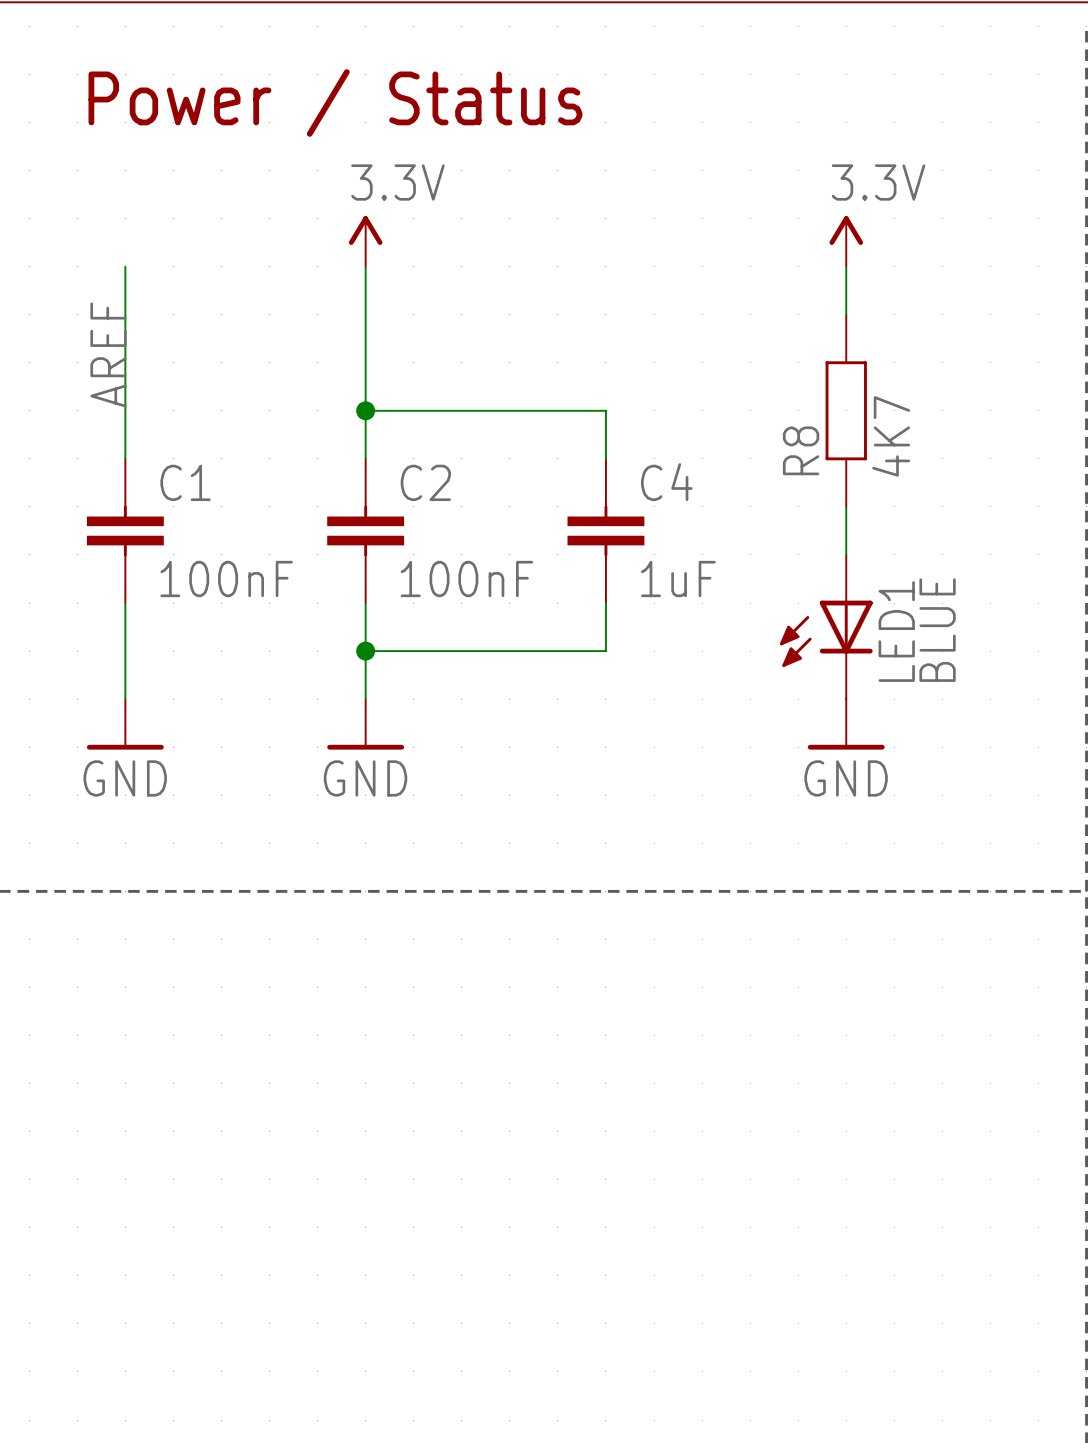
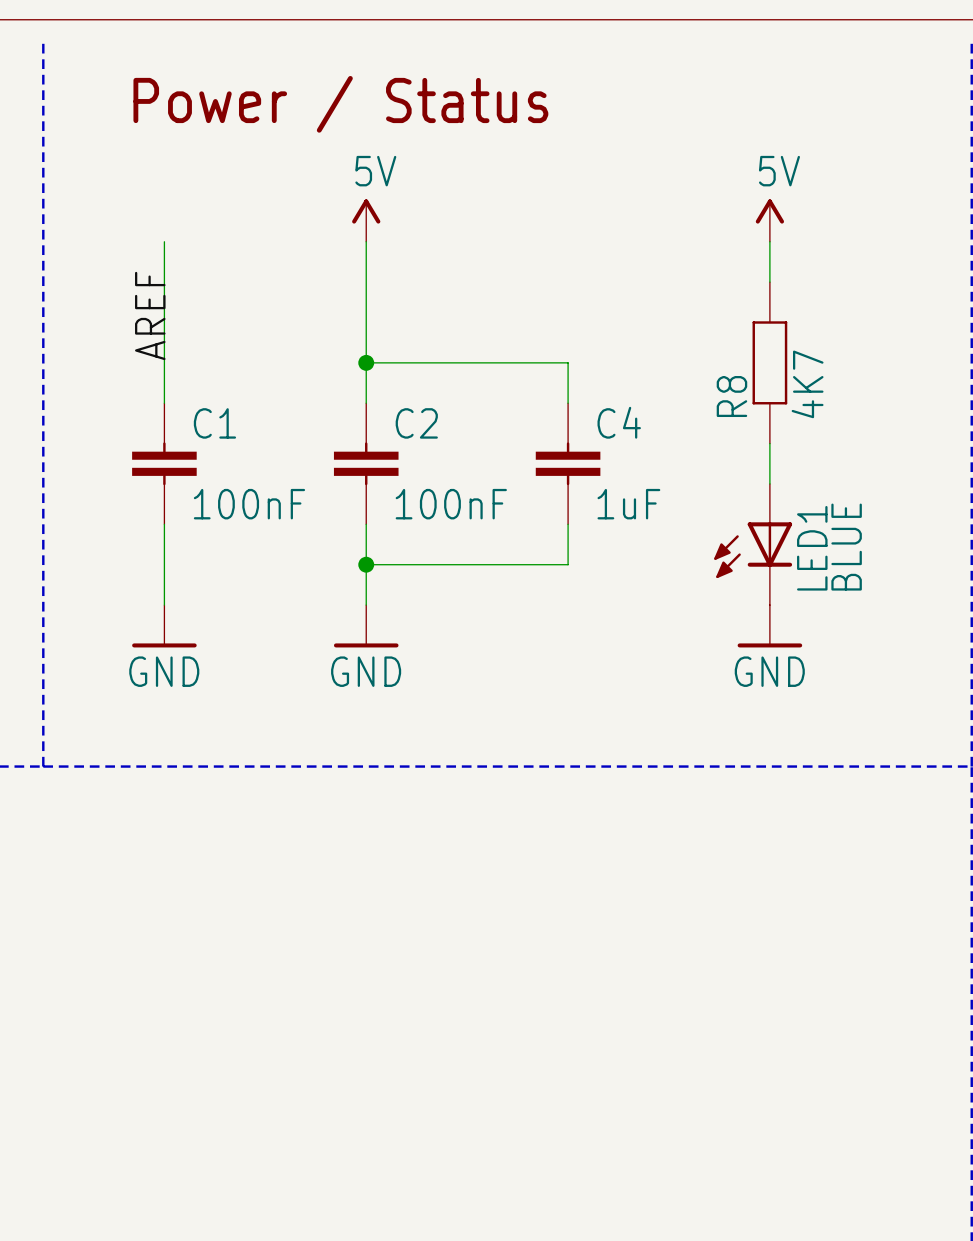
power symbol: 3.3V (365, 241) -> 5V (366, 220)
power symbol: 3.3V (846, 241) -> 5V (769, 220)

